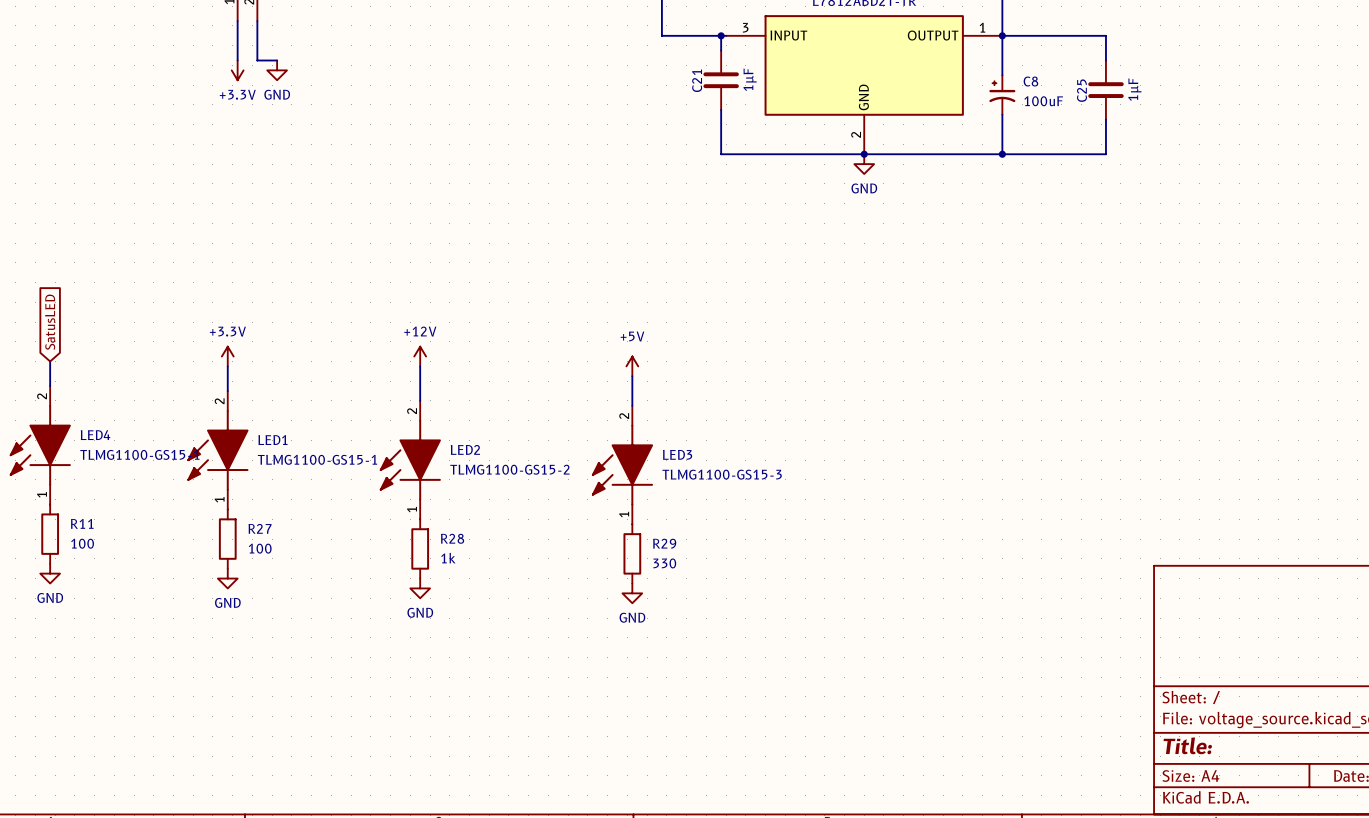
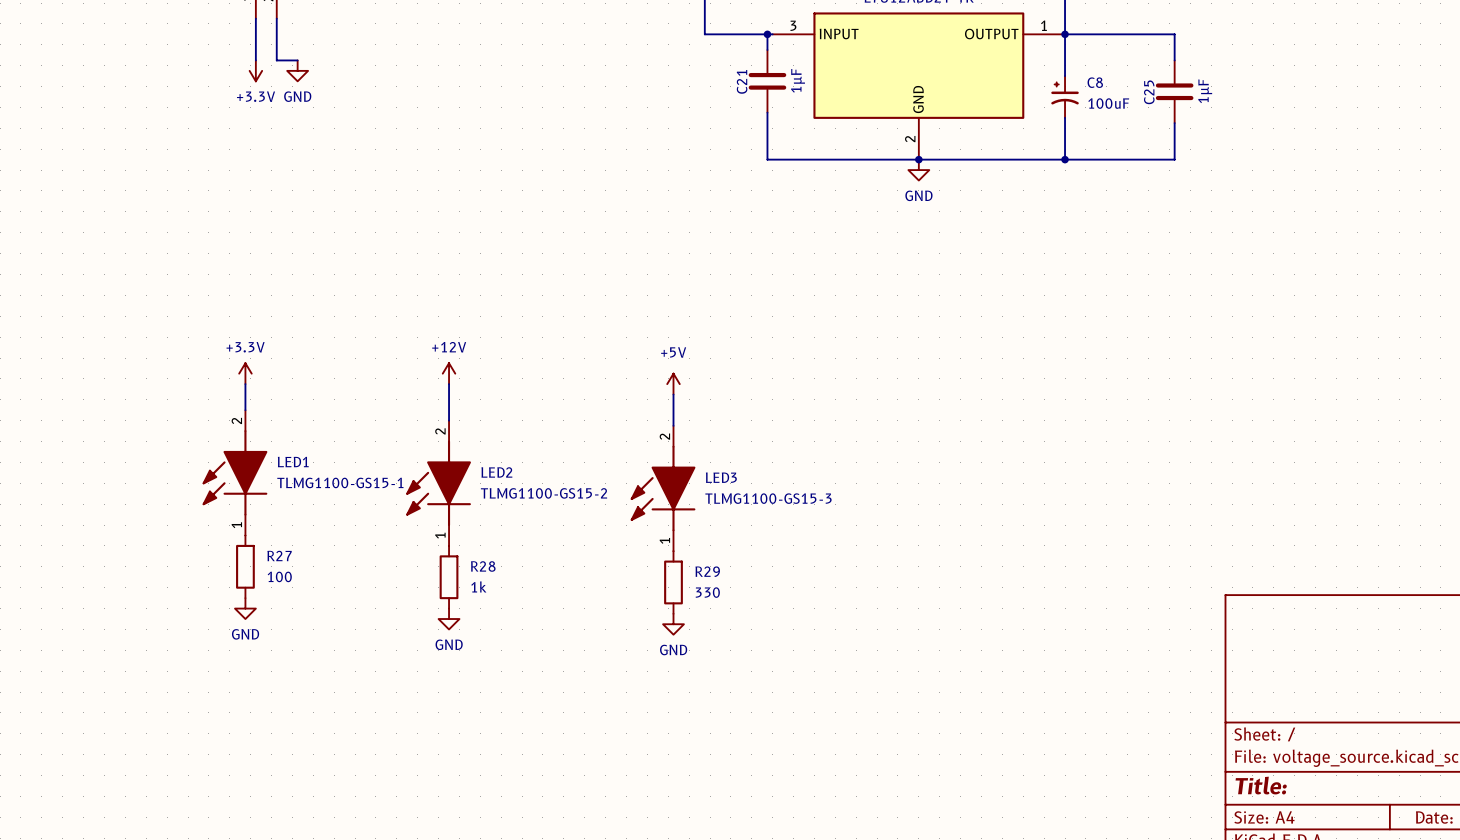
global label: SatusLED (50, 322) -> none
wire: (50, 361) (50, 386) -> none
LED4: TLMG1100-GS15-1 (40, 445) -> none
R11: 100 (50, 534) -> none
power symbol: GND (50, 573) -> none

